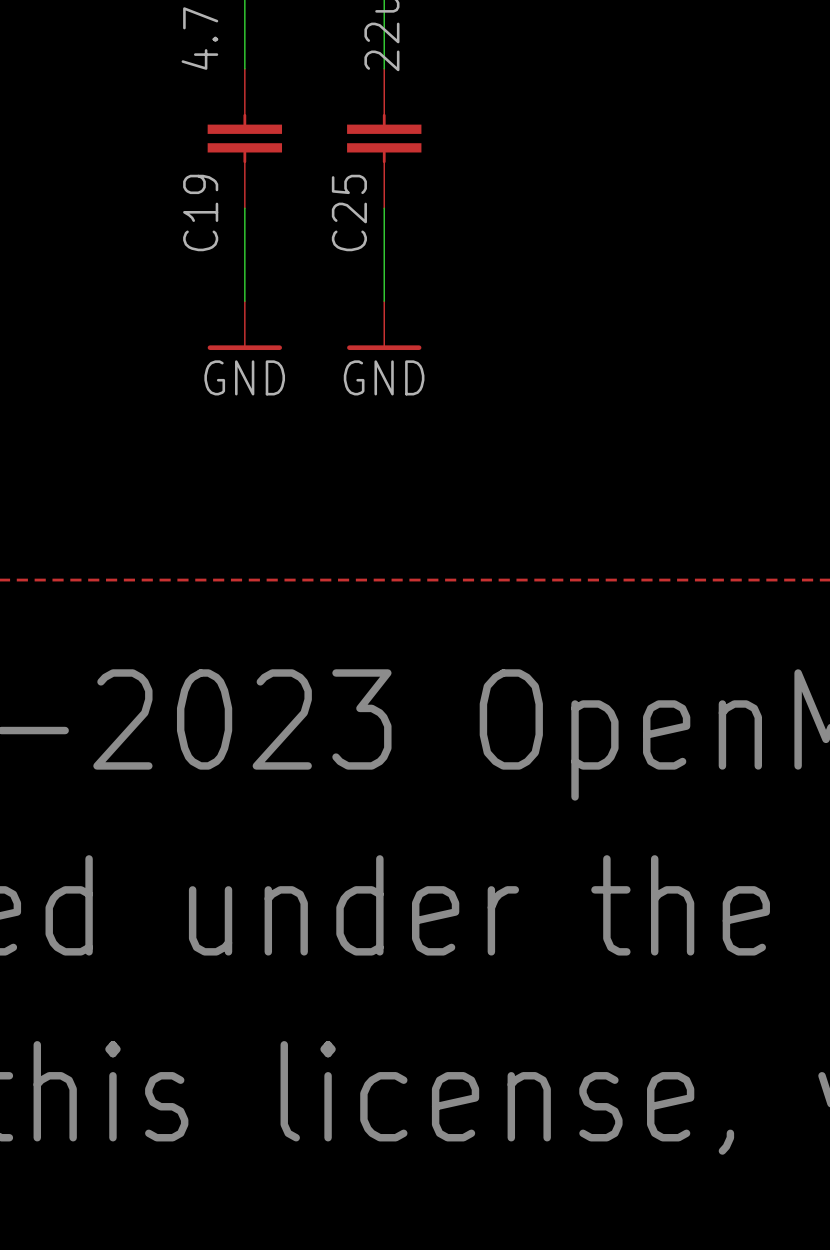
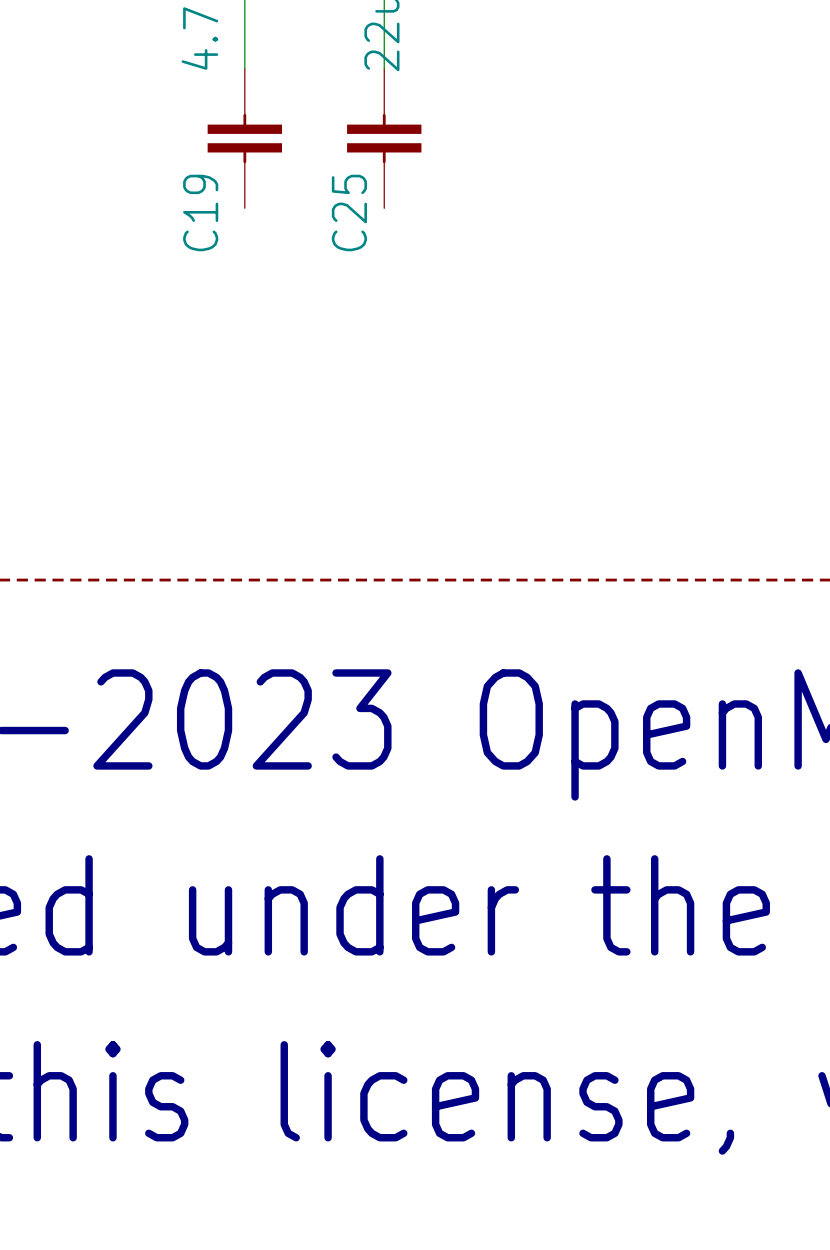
wire: (244, 208) (244, 301) -> none
wire: (384, 208) (384, 301) -> none
power symbol: GND (244, 325) -> none
power symbol: GND (384, 325) -> none

